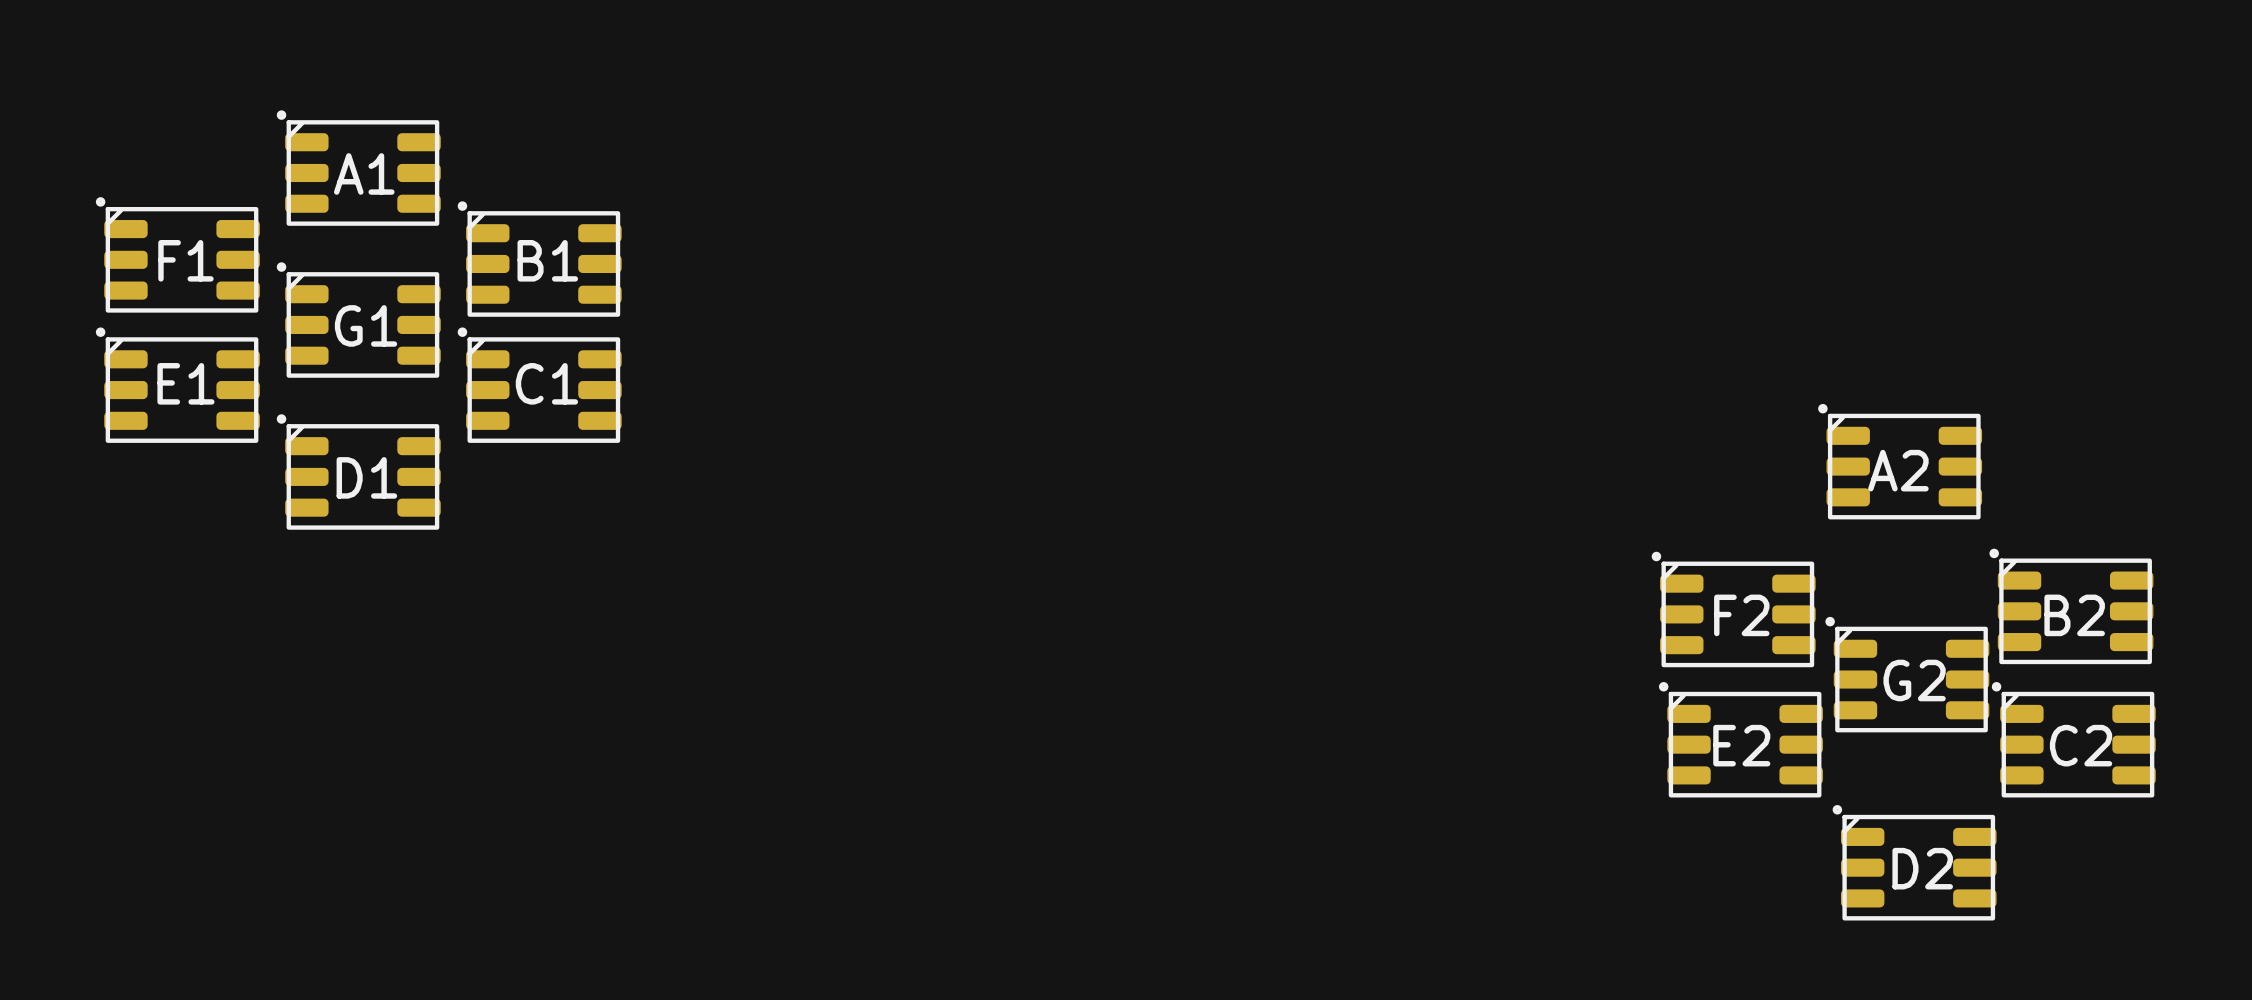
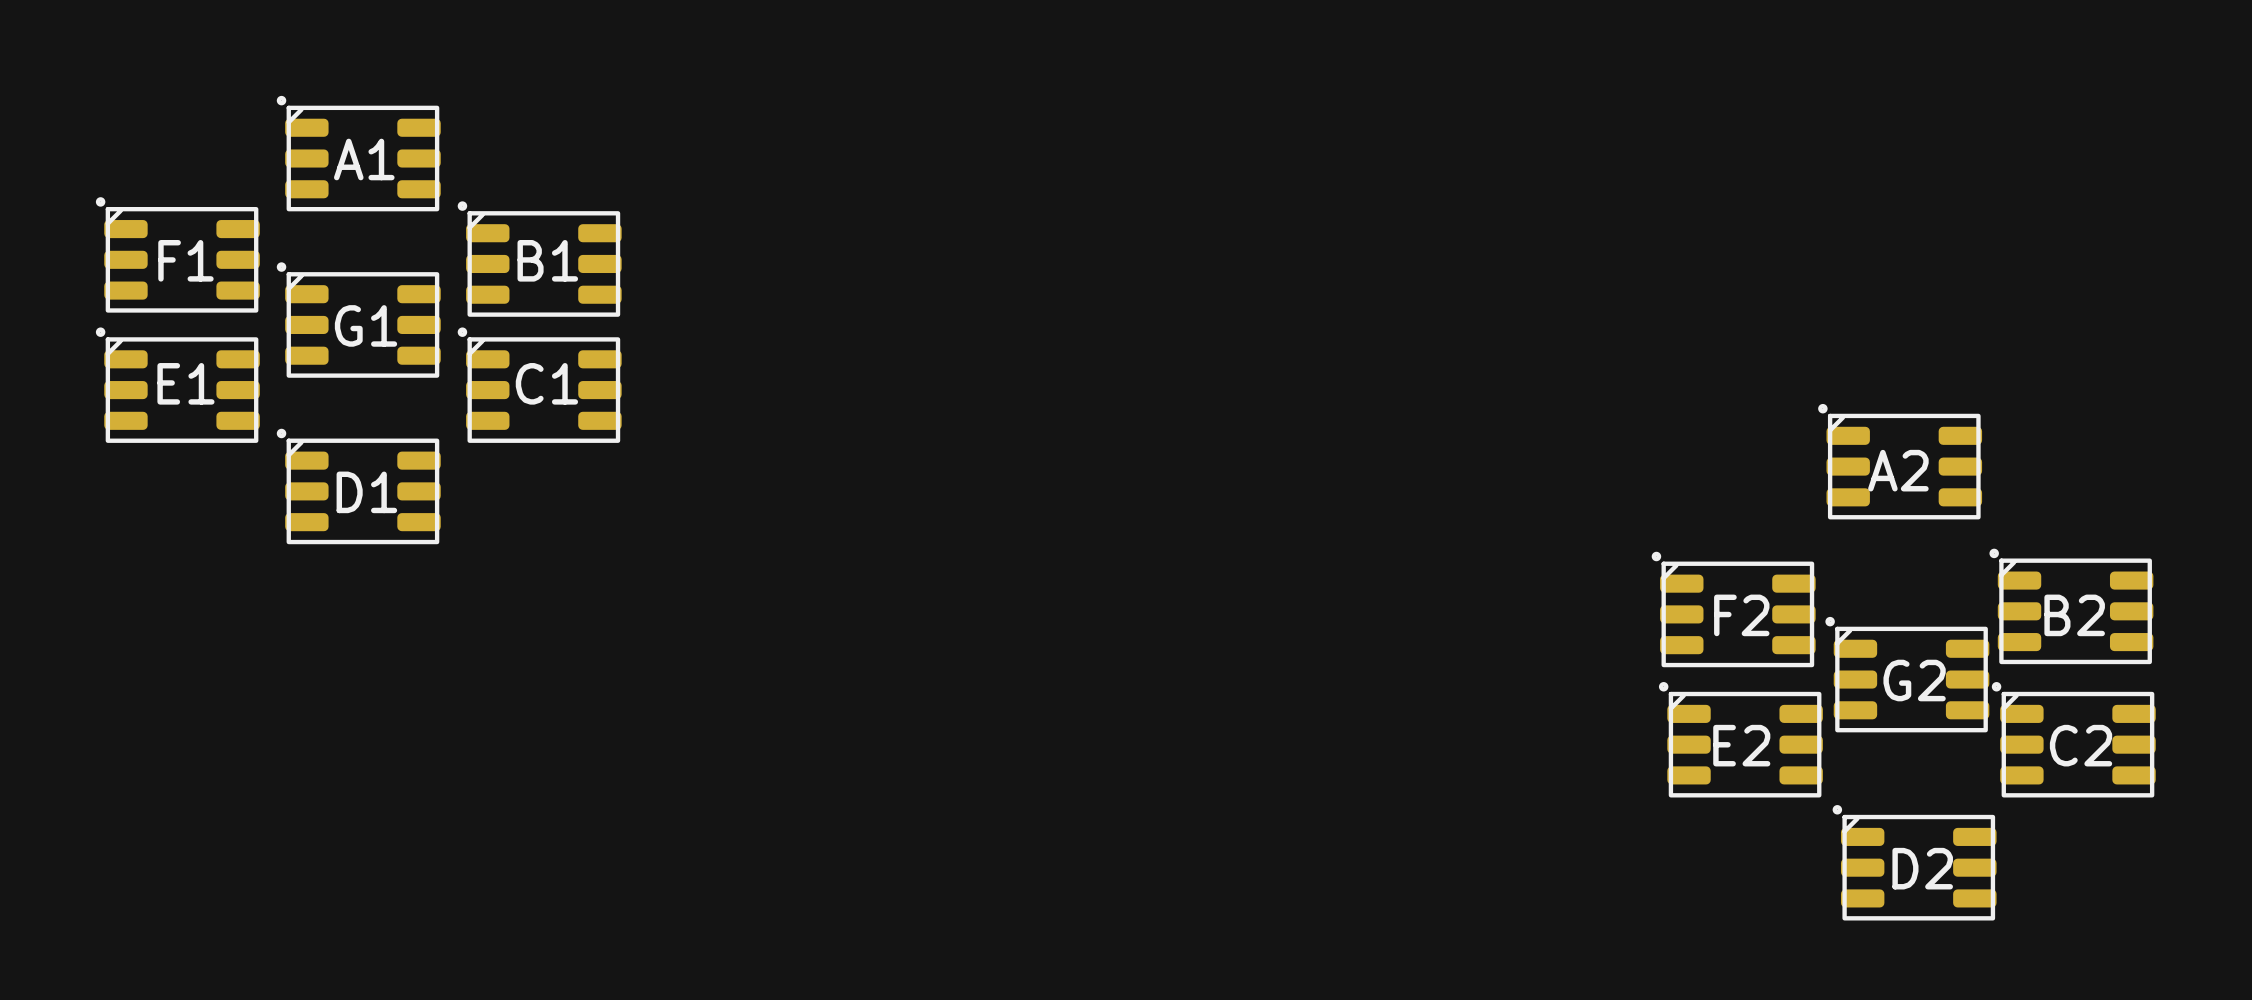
A1 position: (358, 168) -> (358, 153)
D1 position: (358, 472) -> (358, 486)

